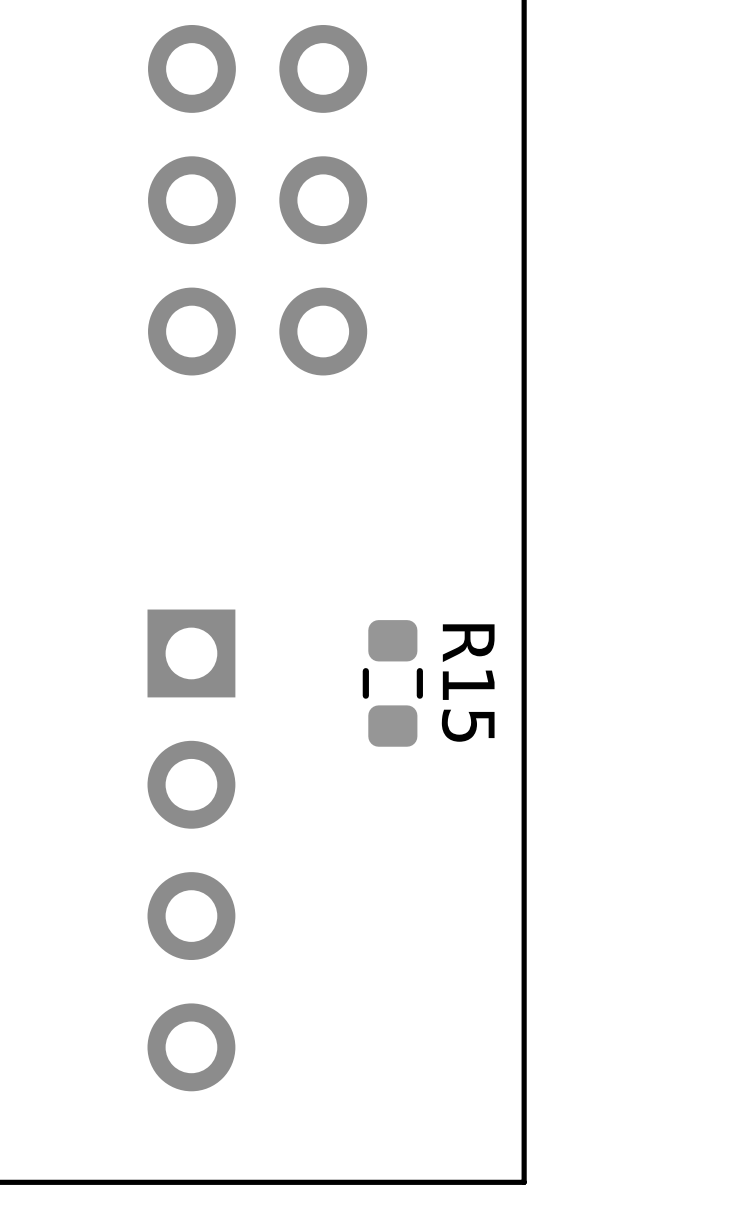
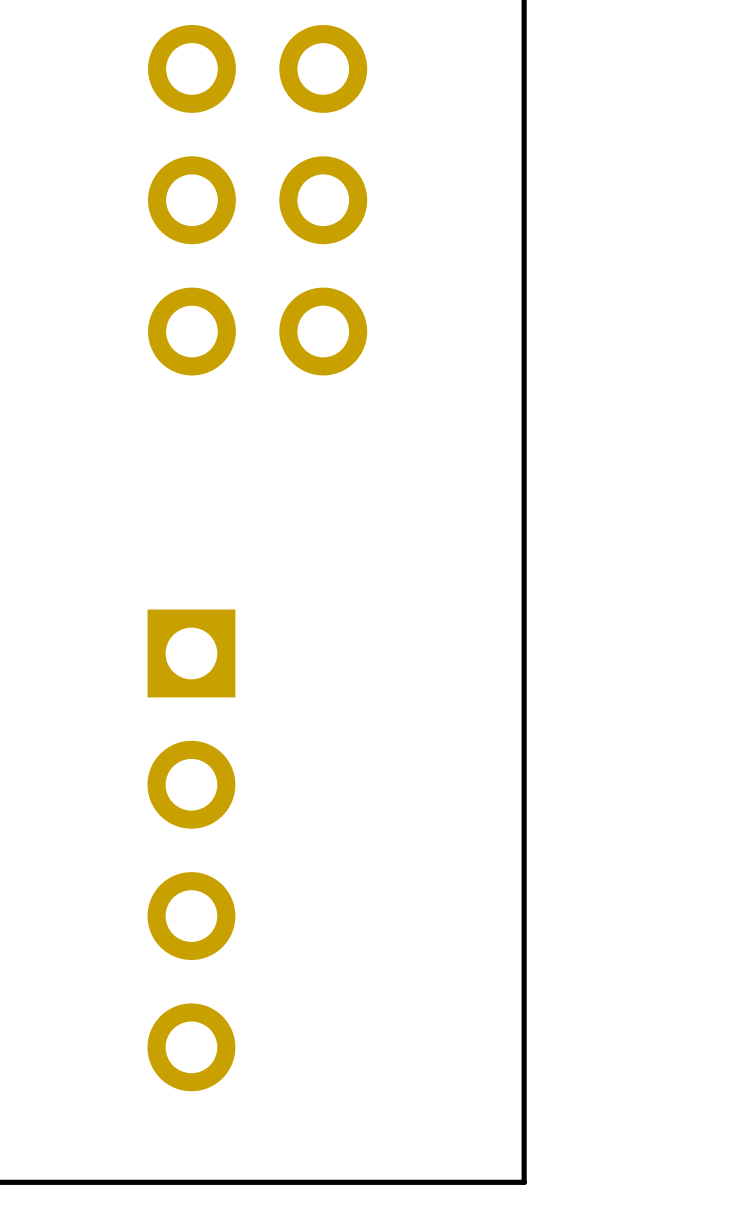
R15: (392, 683) -> none

